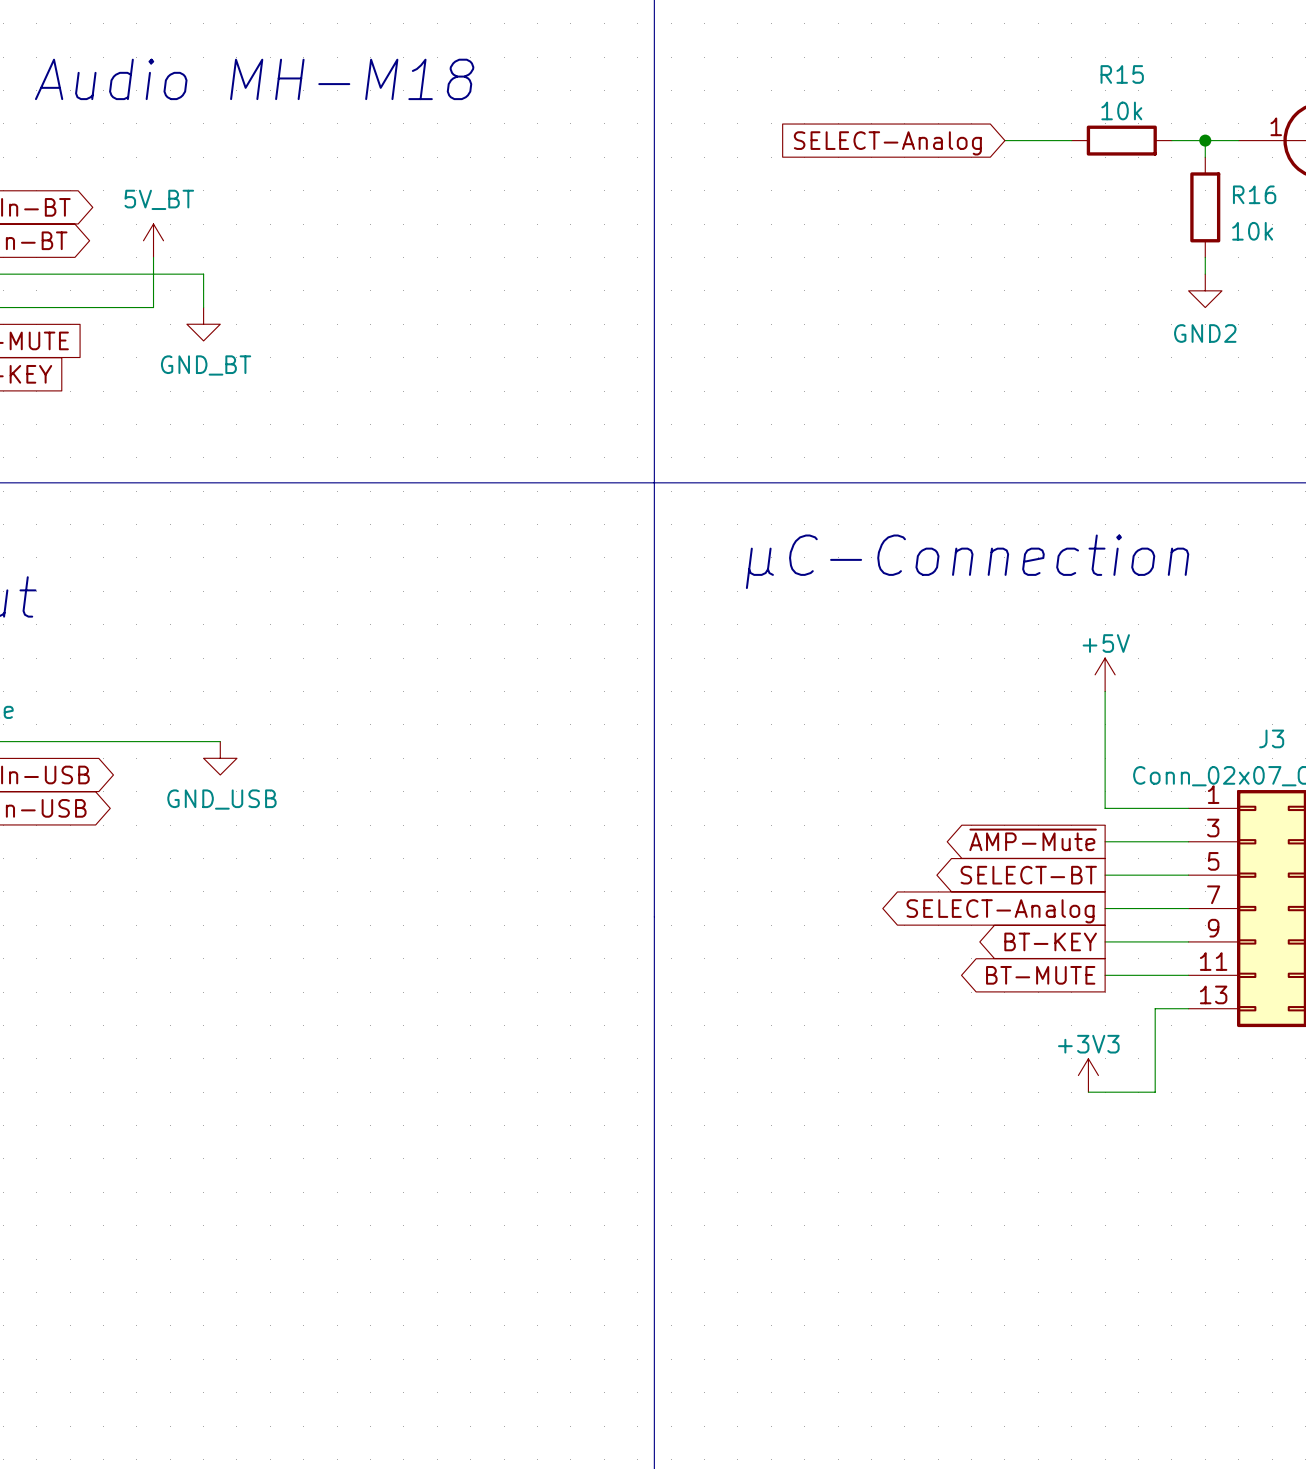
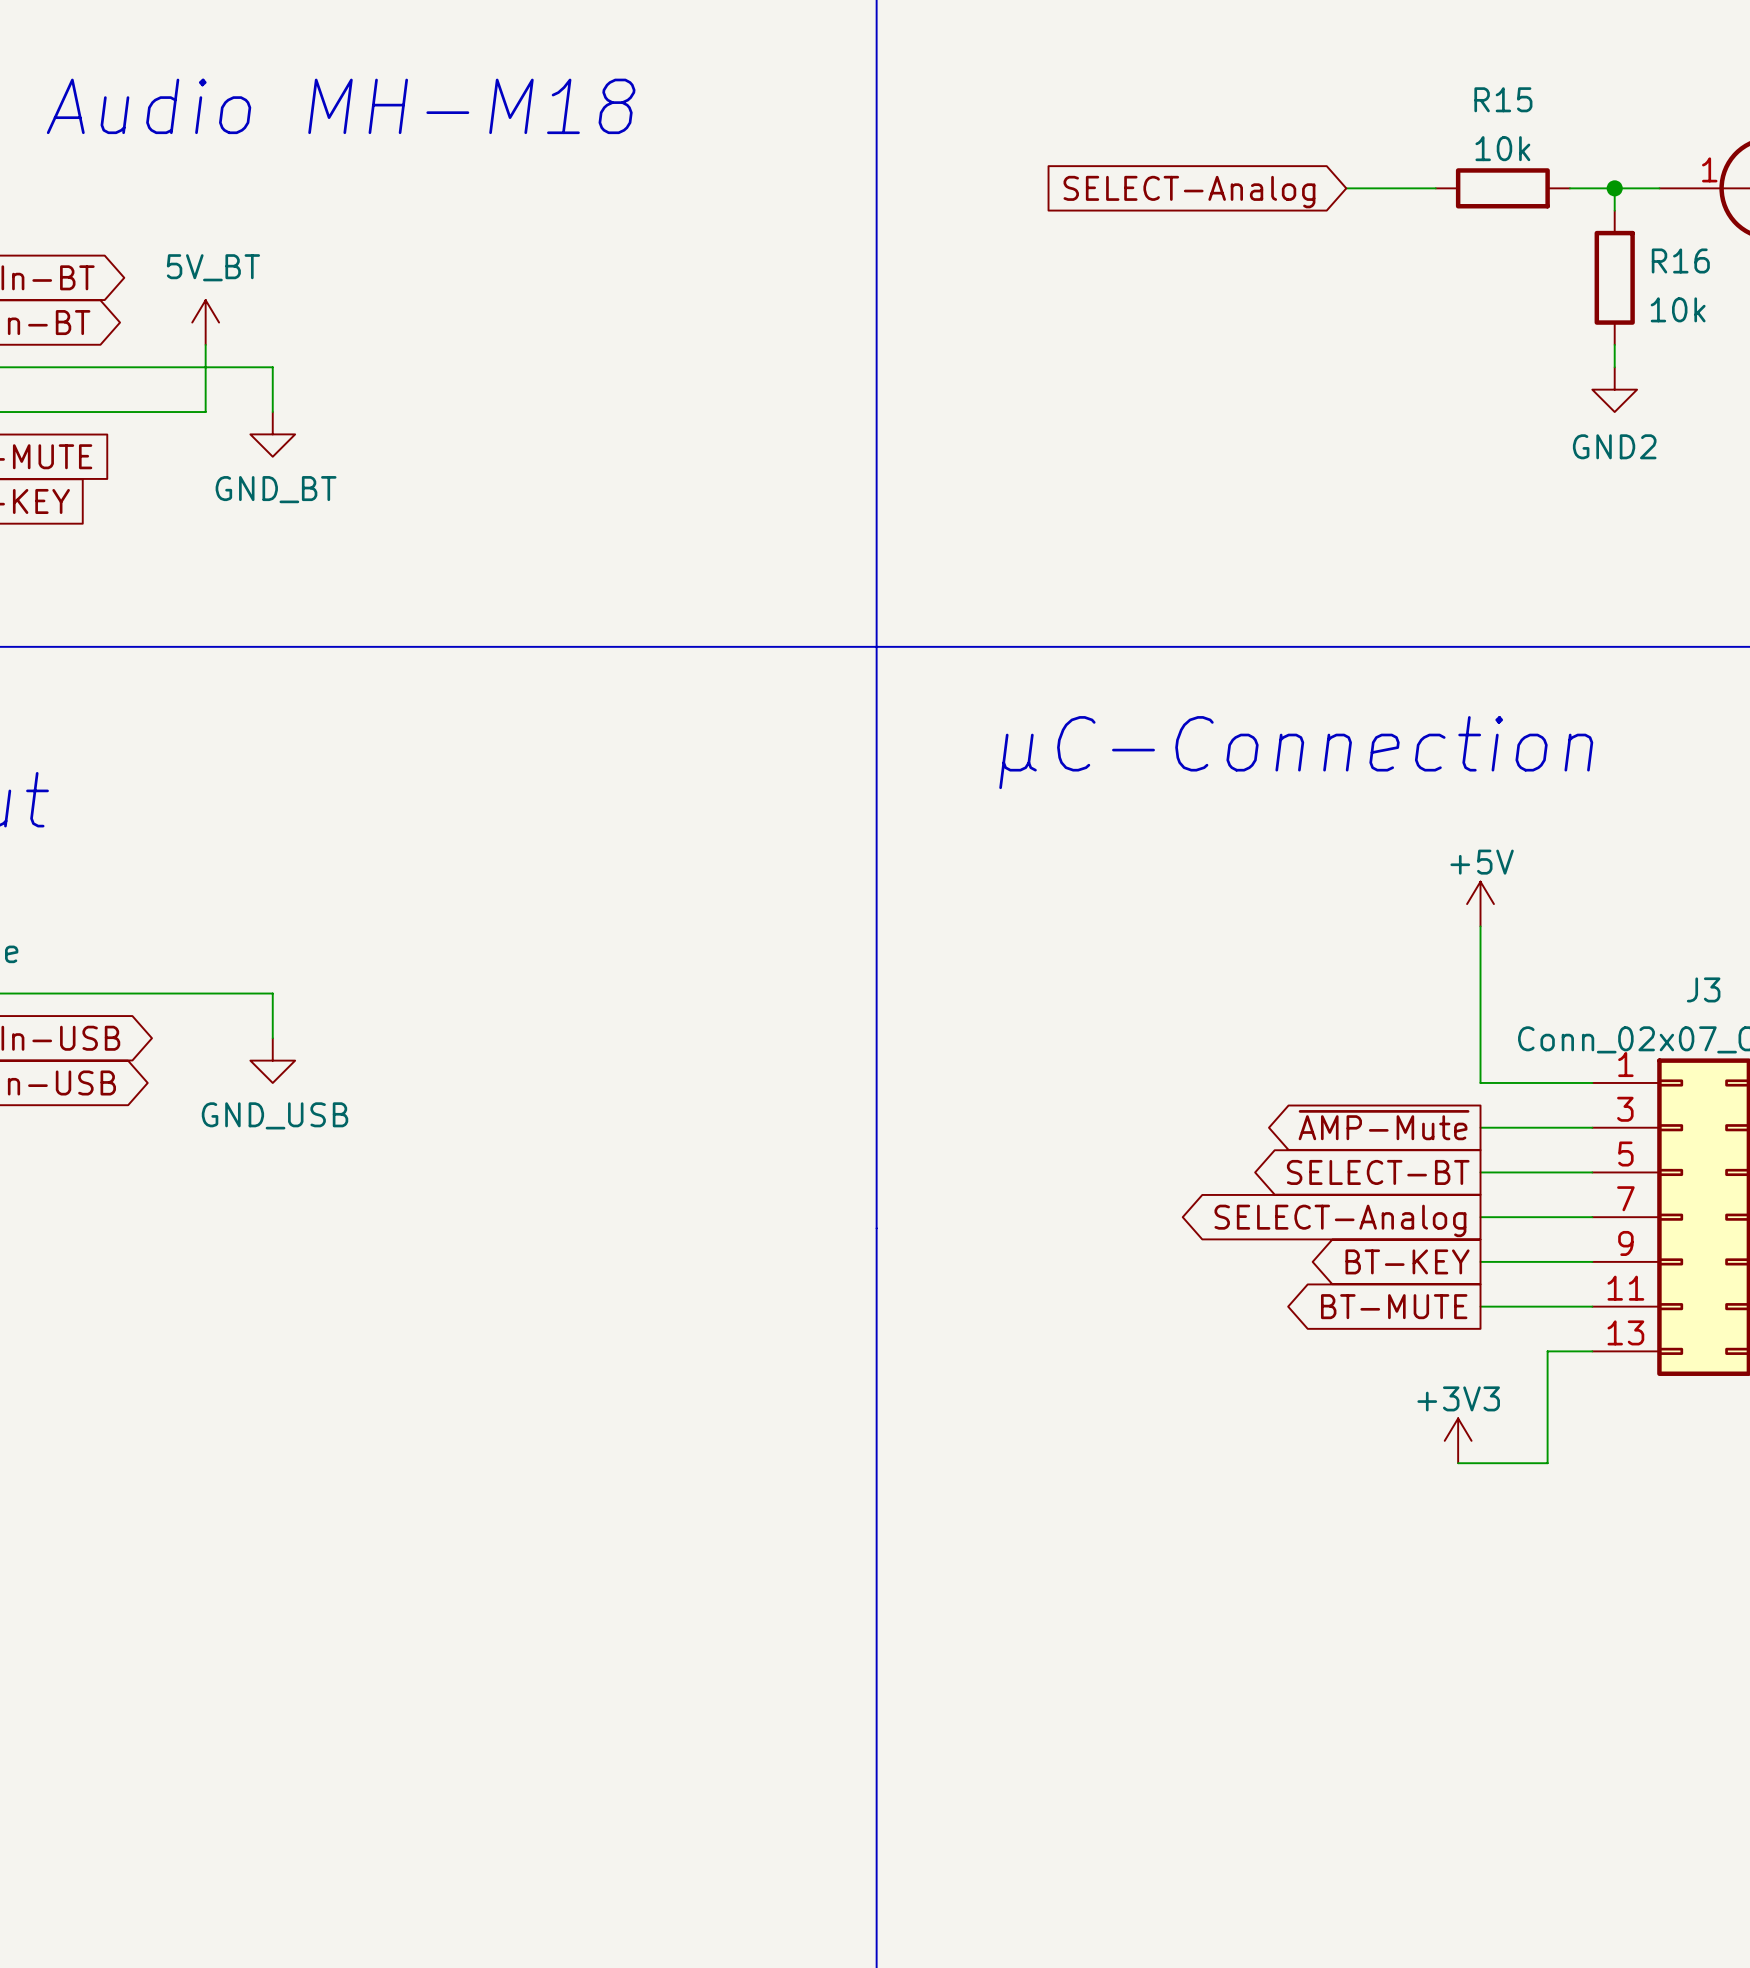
wire: (203, 741) (220, 741) -> (272, 993) (272, 1038)
power symbol position: GND_USB (220, 758) -> GND_USB (272, 1060)

